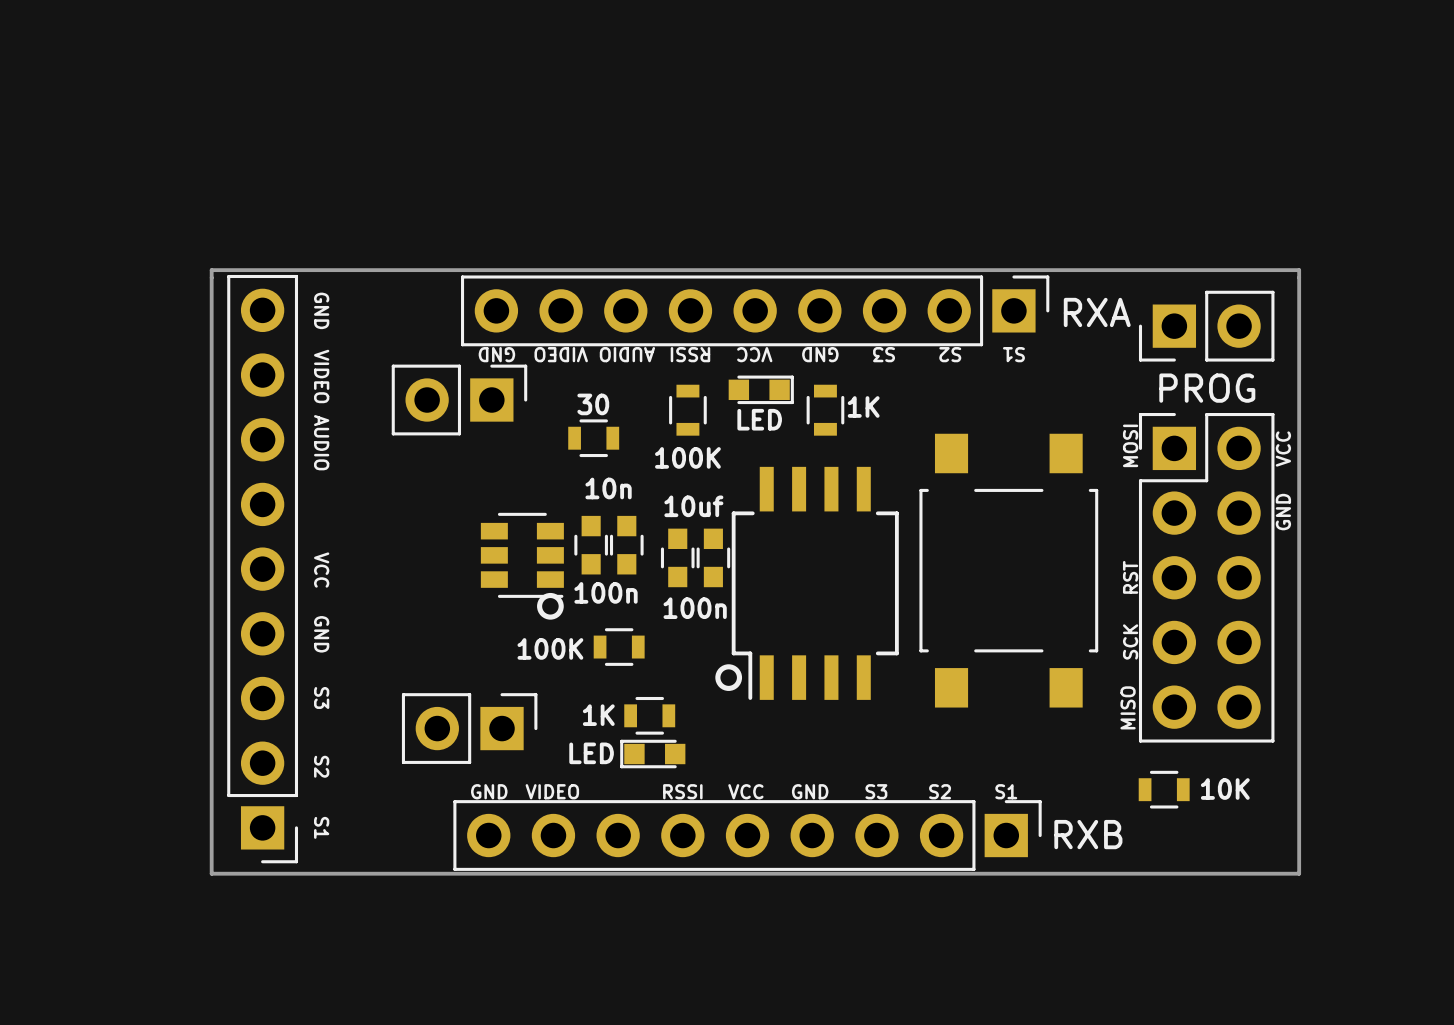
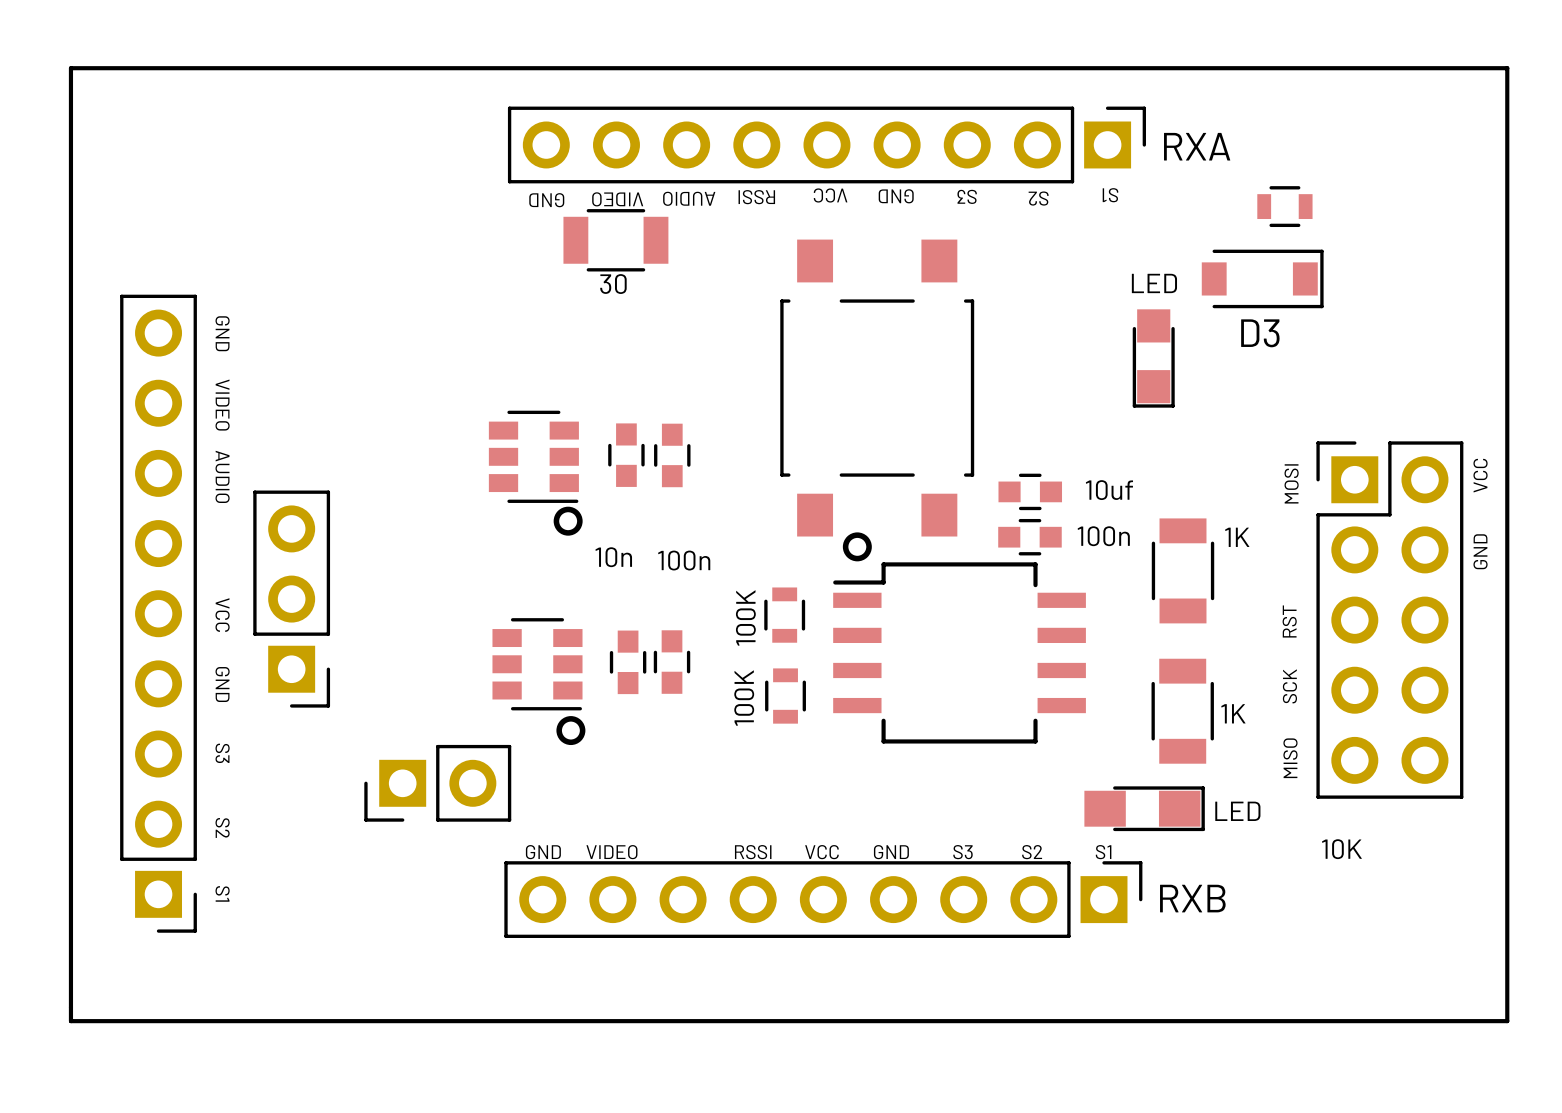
text: none -> VIDEO (617, 199)
text: none -> GND (546, 200)
part: none -> (1284, 206)
part: none -> (615, 240)
D3: none -> (1262, 278)
text: none -> LED (1154, 283)
board edge: (211, 270) (1299, 270) (1299, 873) (211, 873) (211, 270) -> (70, 68) (70, 1021) (1507, 1021) (1507, 68) (70, 68)
part footprint: [227, 274, 299, 864] -> [253, 490, 331, 708]
text: GND (321, 310) -> none
RXA position: (755, 310) -> (826, 144)
text: none -> GND (222, 333)
part: (1206, 326) -> none
part: none -> (1153, 358)
text: GND (496, 354) -> none
text: VIDEO (561, 354) -> none
text position: AUDIO (627, 354) -> AUDIO (689, 198)
text position: RSSI (690, 354) -> RSSI (756, 197)
text position: VCC (754, 354) -> VCC (830, 195)
text position: GND (820, 354) -> GND (896, 196)
text position: S3 (884, 354) -> S3 (967, 196)
text position: S2 (950, 354) -> S2 (1038, 198)
text position: S1 (1013, 354) -> S1 (1110, 195)
text position: VIDEO (321, 376) -> VIDEO (222, 405)
part: (761, 389) -> none
part: (459, 400) -> none
text position: 30 (593, 404) -> 30 (613, 284)
text: 1K (863, 406) -> none
part: (687, 410) -> none
part: (825, 410) -> none
text: LED (759, 419) -> none
part: none -> (626, 455)
part: none -> (672, 455)
part: none -> (533, 456)
part: (593, 438) -> none
text position: AUDIO (321, 442) -> AUDIO (222, 476)
text position: MOSI (1130, 445) -> MOSI (1291, 483)
text position: VCC (1283, 449) -> VCC (1480, 475)
text: 100K (687, 457) -> none
part: none -> (1030, 491)
drawing: none -> [553, 506, 583, 536]
text position: 10n (608, 488) -> 10n (613, 557)
drawing: none -> [842, 532, 872, 562]
text: none -> 100n (1103, 536)
part: none -> (1029, 537)
text: none -> 1K (1237, 537)
text position: 10uf (693, 506) -> 10uf (1109, 490)
text position: GND (1283, 512) -> GND (1480, 551)
text: none -> 100n (684, 560)
part footprint: [696, 528, 731, 588] -> [764, 587, 806, 643]
part: none -> (1183, 570)
part: (591, 545) -> none
part: (626, 545) -> none
part: (522, 555) -> none
part: (677, 557) -> none
text position: VCC (321, 570) -> VCC (222, 615)
part position: (1008, 570) -> (877, 388)
part: none -> (158, 613)
text: none -> 100K (745, 617)
text position: RST (1130, 577) -> RST (1289, 621)
PROG: (1206, 577) -> none
part: none -> (1389, 620)
part rotation: 0° (815, 583) -> 90° clockwise (959, 652)
drawing: [537, 592, 564, 620] -> none
text: 100n (606, 592) -> none
text: 100n (695, 608) -> none
part: none -> (628, 662)
part: none -> (672, 662)
part: none -> (537, 664)
text position: GND (321, 634) -> GND (222, 684)
text position: SCK (1130, 641) -> SCK (1289, 686)
part: (619, 647) -> none
part: none -> (785, 696)
text: 100K (550, 648) -> none
text: none -> 100K (744, 698)
part: none -> (1182, 711)
drawing: [715, 664, 743, 691] -> none
text: none -> 1K (1233, 713)
drawing: none -> [556, 716, 586, 746]
text position: S3 (321, 697) -> S3 (222, 753)
text position: MISO (1128, 707) -> MISO (1290, 758)
text: 1K (598, 715) -> none
part: (649, 715) -> none
part rotation: 0° (469, 728) -> 180° (437, 783)
part: none -> (1144, 808)
text: LED (591, 753) -> none
part: (652, 754) -> none
text: none -> LED (1237, 811)
text position: S2 (321, 766) -> S2 (222, 828)
part: (1164, 789) -> none
text position: S1 (321, 827) -> S1 (222, 893)

